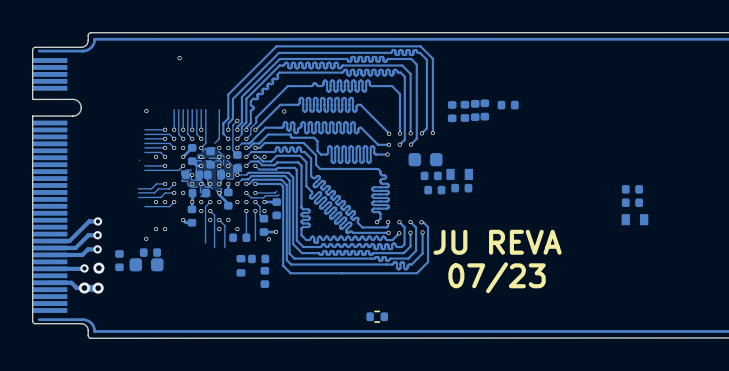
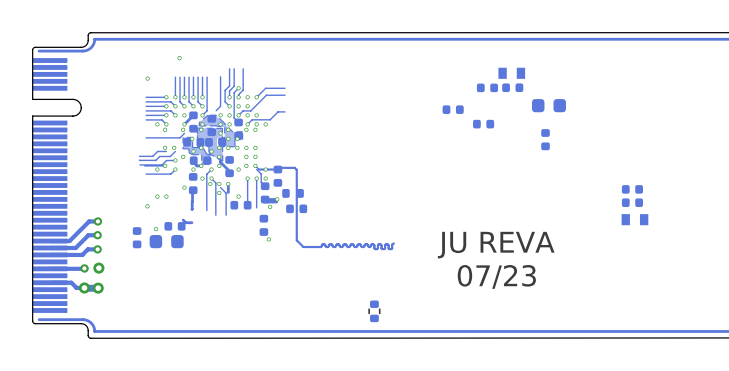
track: none -> (229, 68) (229, 85) (225, 90) (225, 101) (229, 106)
track: none -> (234, 68) (234, 86) (229, 90) (229, 97)
track: none -> (243, 68) (243, 90) (238, 97)
via: none -> (147, 78)
part: none -> (487, 87)
part: none -> (512, 87)
via: none -> (238, 88)
track: none -> (284, 88) (265, 88) (256, 97)
track: none -> (284, 95) (266, 95) (250, 110) (243, 110) (238, 115)
via: none -> (166, 97)
via: none -> (175, 97)
via: none -> (184, 97)
via: none -> (193, 97)
via: none -> (202, 97)
via: none -> (229, 97)
via: none -> (238, 97)
via: none -> (247, 97)
via: none -> (256, 97)
part: (508, 105) -> none
via: none -> (166, 106)
via: none -> (175, 106)
via: none -> (184, 106)
via: none -> (193, 106)
via: none -> (202, 106)
via: none -> (229, 106)
via: none -> (238, 106)
via: none -> (247, 106)
track: (174, 109) (174, 129) -> (175, 77) (175, 97)
track: (178, 109) (178, 134) (183, 138) -> (180, 77) (180, 101) (184, 106)
track: (183, 109) (183, 129) -> (184, 77) (184, 97)
track: (187, 109) (187, 134) (192, 138) -> (189, 77) (189, 101) (193, 106)
track: (192, 109) (192, 129) -> (193, 77) (193, 97)
track: (196, 109) (196, 134) (201, 138) -> (198, 77) (198, 101) (202, 106)
track: (201, 109) (201, 129) -> (202, 77) (202, 97)
track: (205, 109) (205, 143) (201, 147) -> (207, 77) (207, 110) (202, 115)
track: (219, 109) (219, 138) (214, 143) -> (220, 76) (220, 106) (216, 110)
part: (484, 109) -> none
part: (475, 110) -> none
via: (146, 111) -> none
track: none -> (284, 111) (278, 111) (270, 119) (252, 119) (247, 124)
via: (284, 111) -> none
part rotation: 0° (452, 111) -> 90° clockwise (453, 109)
part: (464, 111) -> none
via: none -> (166, 115)
via: none -> (175, 115)
via: none -> (184, 115)
via: none -> (202, 115)
via: none -> (220, 115)
via: none -> (229, 115)
via: none -> (238, 115)
via: none -> (247, 115)
via: none -> (256, 115)
track: (237, 120) (232, 125) (232, 150) (237, 154) -> (238, 88) (234, 92) (234, 118) (238, 122)
via: (237, 120) -> none
part: none -> (193, 122)
via: none -> (157, 124)
via: none -> (166, 124)
via: none -> (184, 124)
via: none -> (202, 124)
via: none -> (220, 124)
via: none -> (229, 124)
via: none -> (247, 124)
via: none -> (256, 124)
via: none -> (265, 124)
part: none -> (483, 124)
part: none -> (211, 125)
track: (165, 129) (144, 129) -> (166, 97) (146, 97)
via: (174, 129) -> none
via: (192, 129) -> none
track: (228, 129) (228, 123) (232, 118) (232, 98) (279, 52) (390, 52) (394, 50) (395, 54) (398, 54) (401, 50) (402, 54) (405, 54) (408, 50) (410, 54) (412, 54) (415, 50) (426, 59) (426, 128) (421, 133) -> none
track: (237, 129) (241, 122) (241, 96) (279, 58) (346, 58) (349, 61) (352, 56) (354, 57) (356, 61) (359, 56) (361, 57) (363, 61) (366, 56) (368, 57) (370, 61) (373, 56) (376, 57) (377, 61) (380, 56) (383, 57) (384, 61) (388, 59) (411, 58) (416, 64) (416, 138) (410, 144) -> none
via: (237, 129) -> none
part: none -> (238, 129)
track: (246, 129) (250, 123) (250, 110) (253, 108) (250, 101) (253, 98) (257, 98) (257, 94) (262, 93) (262, 89) (267, 88) (268, 83) (272, 83) (272, 79) (277, 78) (279, 72) (342, 72) (345, 69) (349, 75) (353, 69) (356, 75) (360, 69) (363, 75) (367, 69) (370, 75) (374, 69) (377, 75) (381, 69) (385, 75) (388, 69) (392, 75) (395, 69) (404, 76) (404, 139) (399, 144) -> none
track: (255, 129) (280, 104) (298, 104) (300, 97) (303, 99) (303, 110) (304, 111) (307, 98) (310, 99) (310, 110) (312, 111) (314, 98) (317, 99) (317, 110) (319, 111) (320, 110) (321, 99) (324, 98) (326, 111) (328, 110) (328, 99) (330, 98) (333, 111) (335, 110) (335, 99) (337, 97) (340, 111) (342, 110) (342, 99) (344, 97) (347, 111) (351, 97) (353, 111) (356, 110) (357, 105) (360, 104) (389, 133) -> none
via: none -> (220, 133)
via: (389, 133) -> none
track: (399, 133) (399, 93) (392, 86) (371, 86) (367, 80) (366, 90) (364, 91) (360, 80) (357, 91) (353, 80) (349, 91) (346, 80) (342, 91) (339, 80) (335, 91) (332, 80) (328, 91) (325, 80) (321, 86) (314, 83) (311, 86) (287, 86) (256, 117) (256, 122) (250, 128) (250, 134) (246, 138) -> none
via: (399, 133) -> none
track: (410, 133) (410, 73) (402, 65) (342, 65) (339, 68) (335, 62) (332, 68) (328, 62) (325, 68) (321, 62) (318, 68) (314, 62) (310, 68) (307, 62) (303, 68) (300, 62) (296, 68) (293, 62) (289, 68) (286, 62) (283, 65) (279, 65) (246, 98) (246, 122) (241, 126) (241, 134) (237, 138) -> none
via: (410, 133) -> none
via: (421, 133) -> none
track: (432, 133) (432, 58) (420, 46) (276, 46) (228, 94) (228, 118) (223, 123) (223, 133) (228, 138) -> none
via: (432, 133) -> none
track: (144, 134) (169, 134) (174, 138) -> (146, 101) (170, 101) (175, 106)
track: (165, 138) (144, 138) -> (166, 106) (146, 106)
via: (165, 138) -> none
via: (174, 138) -> none
via: (183, 138) -> none
via: (201, 138) -> none
via: (246, 138) -> none
part: none -> (545, 139)
part: none -> (193, 142)
part: none -> (215, 142)
track: (144, 143) (169, 143) (174, 147) -> (146, 110) (170, 110) (175, 115)
track: (389, 144) (378, 144) (361, 127) (355, 133) (353, 122) (351, 123) (349, 133) (347, 132) (345, 122) (343, 133) (340, 132) (338, 122) (336, 132) (333, 132) (331, 122) (329, 132) (327, 133) (324, 122) (322, 132) (320, 133) (317, 122) (315, 132) (313, 133) (310, 122) (308, 132) (306, 133) (303, 122) (296, 133) (293, 122) (291, 123) (290, 129) (288, 130) (285, 122) (282, 127) (265, 127) (249, 143) (241, 143) (237, 147) -> none
via: (389, 144) -> none
via: (399, 144) -> none
via: (410, 144) -> none
track: (165, 147) (144, 147) -> (166, 115) (146, 115)
via: (183, 147) -> none
track: (192, 147) (183, 156) -> (193, 115) (184, 124)
zone outline: (214, 147) (231, 164) (241, 164) (241, 172) (233, 172) (233, 179) (217, 178) (217, 170) (223, 170) (223, 159) (197, 158) (198, 155) (206, 147) (214, 147) -> (215, 115) (232, 131) (242, 131) (242, 139) (234, 139) (234, 146) (218, 146) (218, 138) (224, 137) (224, 127) (199, 125) (199, 122) (207, 115) (215, 115)
track: (246, 147) (253, 143) (259, 143) (268, 134) (290, 134) (292, 137) (314, 137) (317, 141) (317, 151) (320, 154) (327, 154) (328, 147) (330, 146) (333, 162) (335, 161) (336, 146) (338, 147) (340, 162) (342, 161) (343, 146) (345, 147) (347, 162) (349, 161) (350, 146) (352, 147) (354, 162) (356, 161) (357, 146) (360, 147) (361, 162) (363, 161) (364, 146) (367, 147) (368, 162) (370, 161) (371, 146) (374, 147) (375, 154) (387, 154) -> none
track: (255, 147) (259, 147) (264, 143) (303, 143) (316, 155) (316, 164) (320, 168) (378, 168) (381, 174) (386, 176) (380, 179) (380, 182) (387, 183) (388, 185) (373, 187) (372, 189) (387, 190) (388, 193) (373, 194) (372, 196) (387, 198) (388, 200) (373, 201) (372, 203) (388, 206) (387, 208) (372, 209) (373, 212) (380, 213) (380, 218) (377, 222) -> none
via: none -> (193, 151)
via: none -> (211, 151)
track: (144, 152) (160, 152) (165, 156) -> (146, 119) (161, 119) (166, 124)
part: (192, 154) -> none
via: (387, 154) -> none
via: (156, 156) -> none
via: (165, 156) -> none
via: (201, 156) -> none
via: (228, 156) -> none
track: (246, 156) (251, 152) (274, 151) (277, 147) (281, 152) (284, 147) (288, 152) (291, 147) (295, 152) (299, 147) (301, 151) (304, 152) (311, 158) (311, 176) (313, 178) (317, 175) (319, 177) (313, 186) (324, 181) (321, 188) (323, 189) (329, 186) (326, 193) (328, 194) (334, 191) (331, 198) (333, 199) (339, 196) (336, 202) (338, 204) (344, 201) (341, 207) (343, 209) (349, 206) (346, 212) (347, 214) (354, 211) (351, 217) (352, 219) (357, 217) (357, 222) (362, 227) (386, 227) (388, 222) -> none
track: (255, 156) (258, 156) (262, 161) (271, 161) (276, 155) (300, 155) (306, 162) (306, 186) (312, 192) (310, 197) (312, 198) (320, 192) (315, 202) (317, 203) (325, 197) (319, 206) (322, 208) (330, 202) (325, 211) (326, 213) (335, 207) (330, 216) (331, 218) (340, 212) (335, 221) (335, 223) (345, 217) (340, 228) (349, 222) (351, 224) (346, 230) (347, 232) (388, 232) -> none
via: (264, 156) -> none
part: (210, 158) -> none
part position: (425, 159) -> (548, 105)
via: none -> (175, 160)
zone outline: (196, 160) (196, 178) (207, 178) (207, 185) (221, 193) (221, 160) (196, 160) -> (197, 128) (197, 146) (209, 146) (208, 153) (222, 161) (222, 128) (197, 128)
part: none -> (200, 160)
part: (237, 161) -> none
track: (183, 165) (178, 170) (144, 170) -> (184, 133) (180, 137) (146, 137)
via: (183, 165) -> none
via: (228, 165) -> none
track: (246, 165) (250, 161) (258, 161) (262, 165) (274, 165) (277, 162) (298, 162) (301, 165) (301, 207) (309, 211) (301, 214) (302, 216) (309, 218) (302, 220) (301, 222) (309, 225) (301, 227) (301, 235) (306, 240) (309, 239) (312, 236) -> none
part: none -> (229, 166)
via: none -> (157, 169)
via: none -> (175, 169)
zone outline: (191, 169) (191, 180) (201, 180) (205, 186) (209, 187) (209, 196) (200, 196) (200, 187) (191, 187) (187, 185) (187, 181) (181, 181) (181, 169) (191, 169) -> (192, 137) (192, 147) (202, 147) (206, 154) (210, 155) (211, 163) (201, 163) (201, 154) (192, 154) (189, 153) (188, 148) (183, 148) (183, 137) (192, 137)
via: none -> (193, 169)
via: none -> (211, 169)
via: none -> (238, 169)
via: none -> (265, 169)
part: (192, 174) -> none
via: (192, 174) -> none
part: (214, 174) -> none
via: (228, 174) -> none
track: (237, 174) (246, 174) (248, 172) (288, 172) (293, 177) (293, 244) (302, 253) (322, 254) (324, 251) (327, 254) (329, 254) (331, 251) (334, 254) (337, 254) (338, 251) (341, 254) (344, 254) (345, 251) (348, 254) (351, 254) (352, 251) (355, 254) (358, 254) (359, 251) (362, 254) (365, 254) (366, 251) (369, 254) (403, 253) (410, 246) (410, 232) -> none
via: (237, 174) -> none
part position: (459, 174) -> (511, 73)
part: (431, 175) -> none
part: none -> (277, 176)
via: none -> (202, 178)
via: none -> (211, 178)
via: none -> (247, 178)
via: none -> (256, 178)
via: none -> (265, 178)
track: (165, 183) (156, 183) (151, 188) (138, 188) -> (166, 151) (157, 151) (152, 156) (139, 156)
via: (165, 183) -> none
track: (174, 183) (169, 188) (158, 188) (154, 192) (138, 192) -> (175, 151) (170, 156) (159, 156) (155, 160) (139, 160)
via: (174, 183) -> none
via: (192, 183) -> none
part: none -> (193, 183)
via: (201, 183) -> none
track: (237, 183) (241, 179) (248, 179) (251, 176) (284, 176) (289, 180) (289, 253) (294, 258) (378, 257) (379, 260) (382, 257) (385, 257) (386, 260) (390, 258) (408, 258) (416, 250) (416, 227) (410, 222) -> none
via: (237, 183) -> none
track: (246, 183) (253, 179) (281, 179) (286, 185) (286, 260) (291, 264) (392, 264) (395, 262) (398, 269) (400, 262) (403, 262) (406, 269) (408, 265) (411, 264) (422, 253) (422, 232) -> none
via: (246, 183) -> none
track: (255, 183) (280, 183) (283, 186) (283, 265) (290, 273) (416, 273) (428, 262) (428, 227) (421, 222) -> none
via: (255, 183) -> none
via: none -> (184, 187)
part: (461, 188) -> none
part: (434, 190) -> none
track: (276, 191) (275, 193) (255, 193) -> none
part: none -> (265, 192)
track: (174, 193) (165, 193) (160, 197) (138, 197) -> (175, 160) (166, 160) (162, 164) (140, 164)
via: (174, 193) -> none
via: (183, 193) -> none
part: (199, 193) -> none
track: (219, 193) (228, 205) -> (220, 160) (229, 173)
track: (246, 193) (251, 197) (278, 194) -> none
via: (246, 193) -> none
via: (255, 193) -> none
via: none -> (157, 196)
via: none -> (166, 196)
via: none -> (238, 196)
part rotation: 0° (228, 199) -> 90° clockwise (240, 205)
part position: (228, 199) -> (240, 205)
via: none -> (277, 199)
via: (156, 202) -> none
via: (165, 202) -> none
track: (174, 202) (169, 206) (144, 206) -> (175, 169) (170, 174) (146, 174)
via: (174, 202) -> none
via: (192, 202) -> none
via: (201, 202) -> none
track: (210, 202) (205, 206) (205, 243) -> (211, 169) (206, 174) (206, 210)
via: (210, 202) -> none
via: (219, 202) -> none
via: (237, 202) -> none
via: (246, 202) -> none
track: (255, 202) (259, 206) (259, 214) (263, 218) -> (256, 169) (261, 174) (261, 182) (265, 186)
via: (255, 202) -> none
via: (264, 202) -> none
via: none -> (147, 206)
via: none -> (270, 206)
part: (276, 208) -> none
part: none -> (296, 208)
via: (201, 211) -> none
track: (210, 211) (214, 215) (214, 247) -> (211, 178) (215, 182) (215, 215)
via: (210, 211) -> none
track: (246, 211) (246, 240) -> (247, 178) (247, 207)
via: (246, 211) -> none
track: (255, 211) (255, 240) -> (256, 178) (256, 207)
via: (255, 211) -> none
via: (264, 211) -> none
part: (191, 216) -> none
via: (183, 220) -> none
via: (210, 220) -> none
track: (219, 220) (224, 225) (224, 247) -> (220, 187) (226, 193) (226, 215)
via: (219, 220) -> none
via: (228, 220) -> none
via: (377, 222) -> none
via: (388, 222) -> none
track: (399, 222) (404, 227) (404, 244) (401, 247) (397, 247) (394, 243) -> none
via: (399, 222) -> none
via: (410, 222) -> none
via: (421, 222) -> none
part: none -> (175, 226)
via: (165, 229) -> none
via: (219, 229) -> none
via: (237, 229) -> none
via: (275, 231) -> none
track: (275, 232) (263, 232) -> (277, 199) (265, 199)
via: (388, 232) -> none
via: (410, 232) -> none
via: (422, 232) -> none
track: (399, 233) (392, 240) (386, 239) (383, 236) -> none
via: (399, 233) -> none
track: (312, 236) (315, 242) (317, 242) (318, 236) (323, 240) -> none
track: (333, 236) (330, 240) -> none
track: (340, 236) (337, 240) (333, 236) -> none
track: (348, 236) (351, 240) -> none
track: (348, 236) (344, 240) (341, 236) -> none
track: (369, 236) (365, 240) -> none
track: (376, 236) (373, 240) (369, 236) -> none
track: (383, 236) (380, 240) (376, 236) -> none
part: none -> (137, 237)
part: (239, 237) -> none
via: (146, 238) -> none
track: (330, 240) (326, 236) (323, 240) -> none
track: (358, 240) (355, 236) (351, 240) -> none
track: (365, 240) (362, 236) (358, 240) -> none
part: (150, 252) -> none
part: (258, 258) -> none
part: (119, 260) -> none
part position: (146, 264) -> (166, 241)
part rotation: 0° (240, 265) -> 90° clockwise (293, 193)
part position: (240, 265) -> (293, 193)
part: (264, 277) -> none
part rotation: 0° (377, 316) -> 90° clockwise (374, 311)

